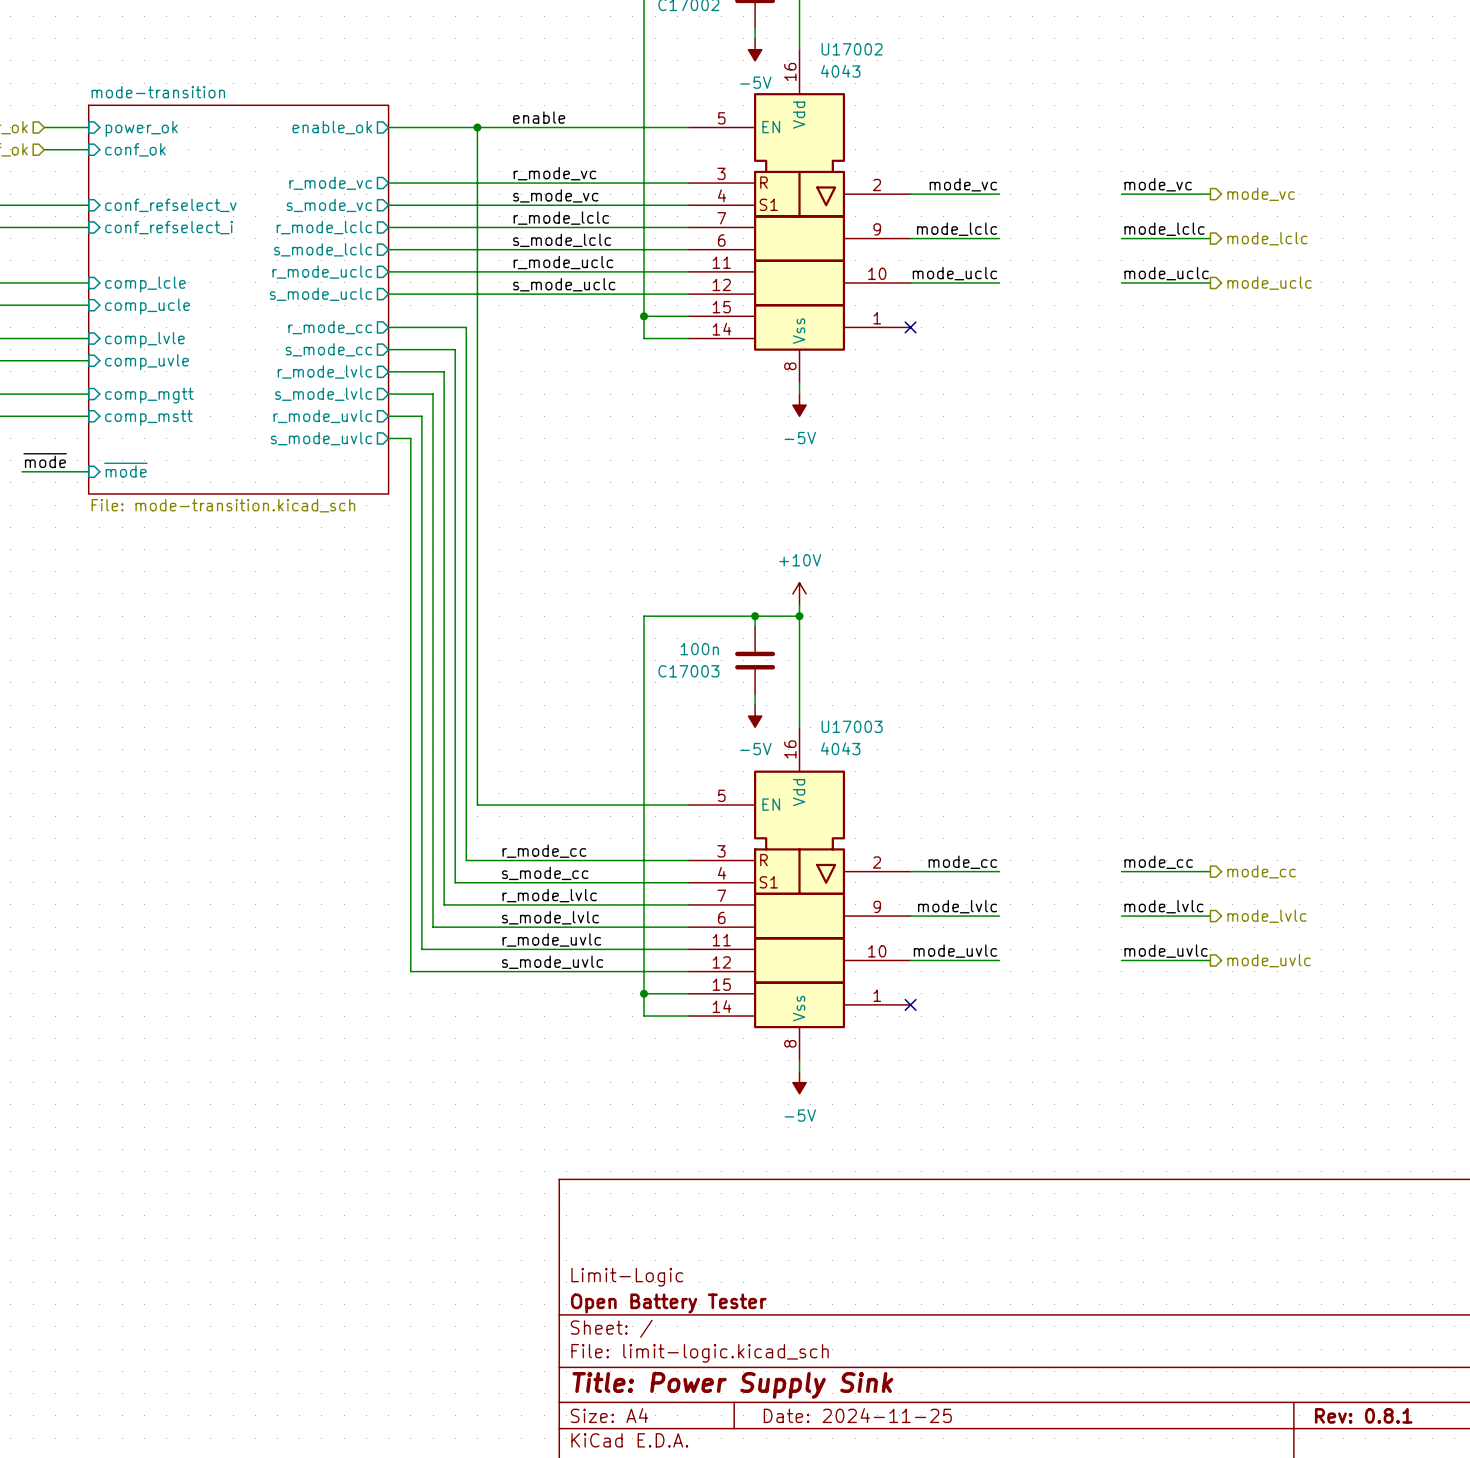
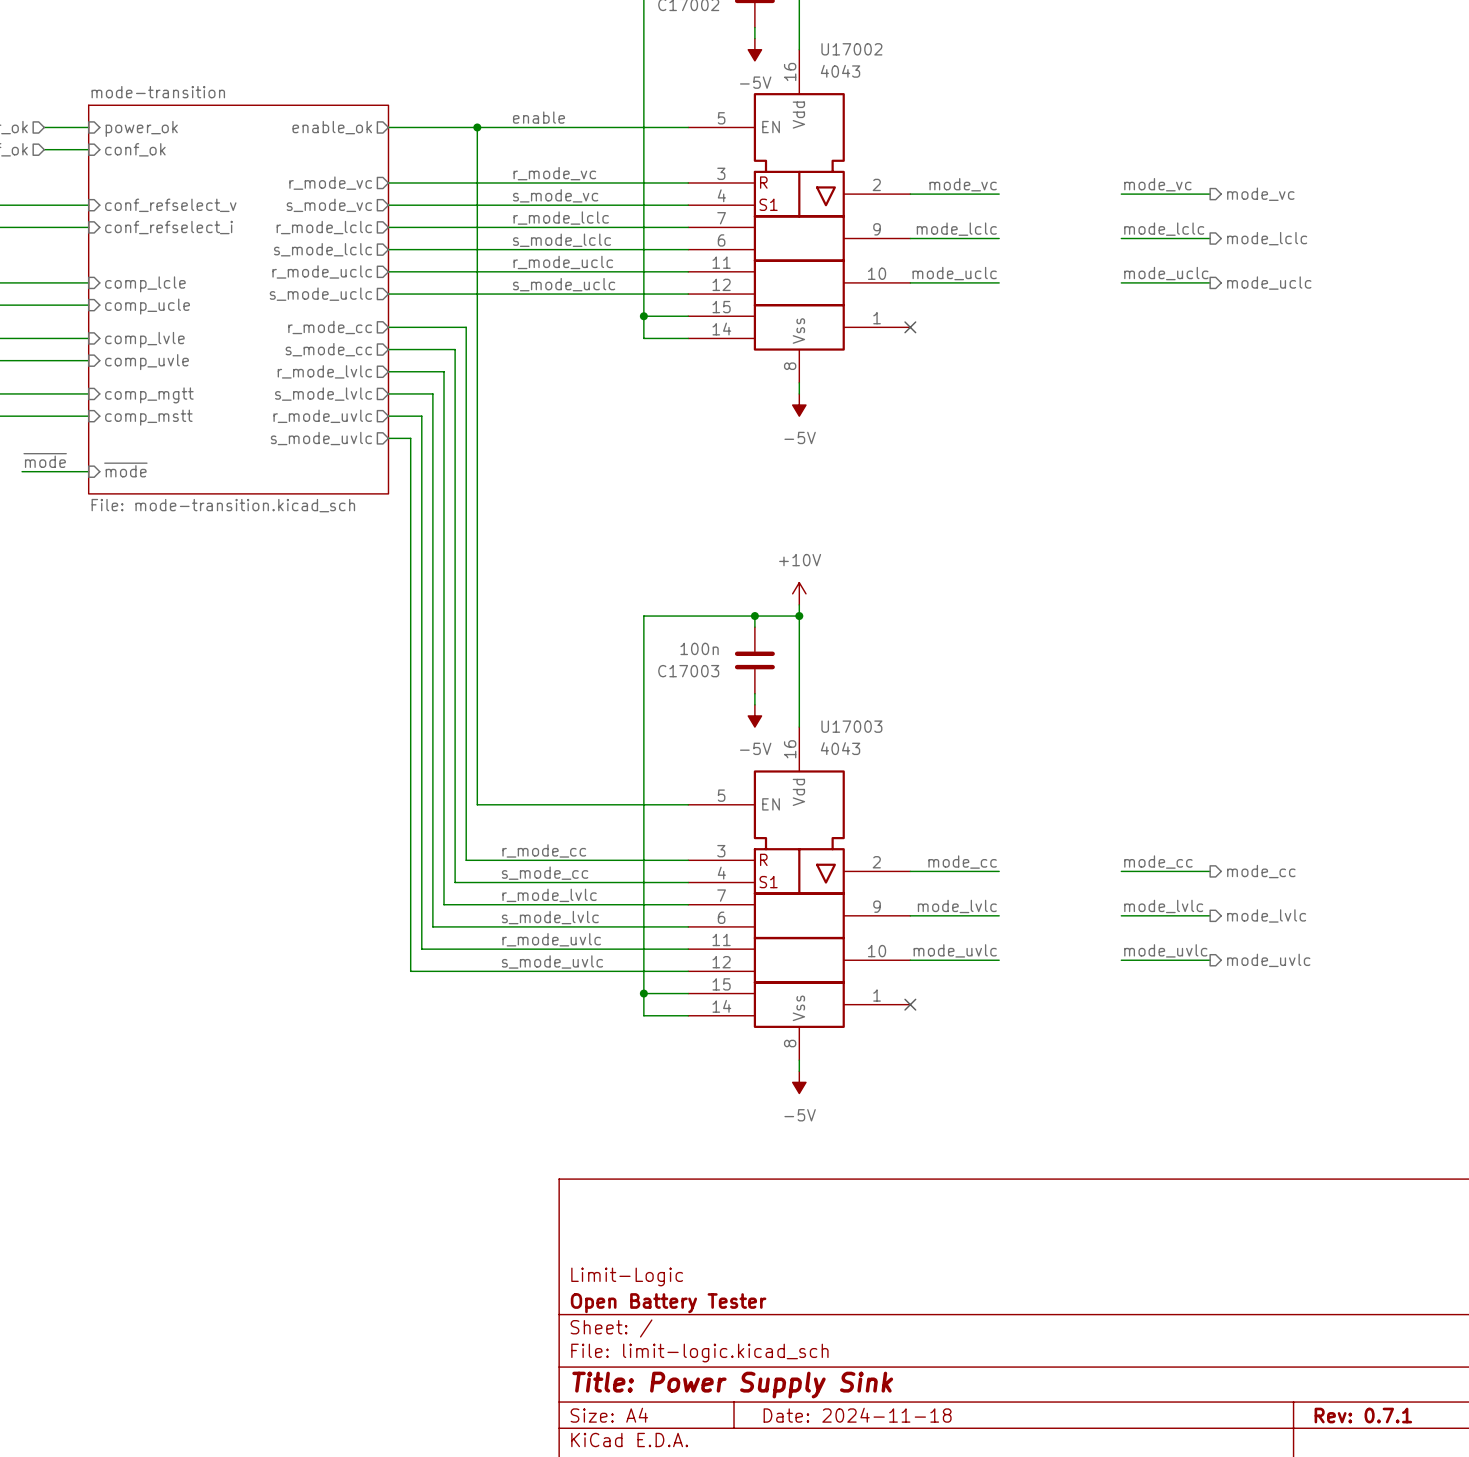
title block: Date: 2024-11-25 (857, 1415) -> Date: 2024-11-18 (857, 1415)
title block: Rev: 0.8.1 (1363, 1415) -> Rev: 0.7.1 (1363, 1415)

